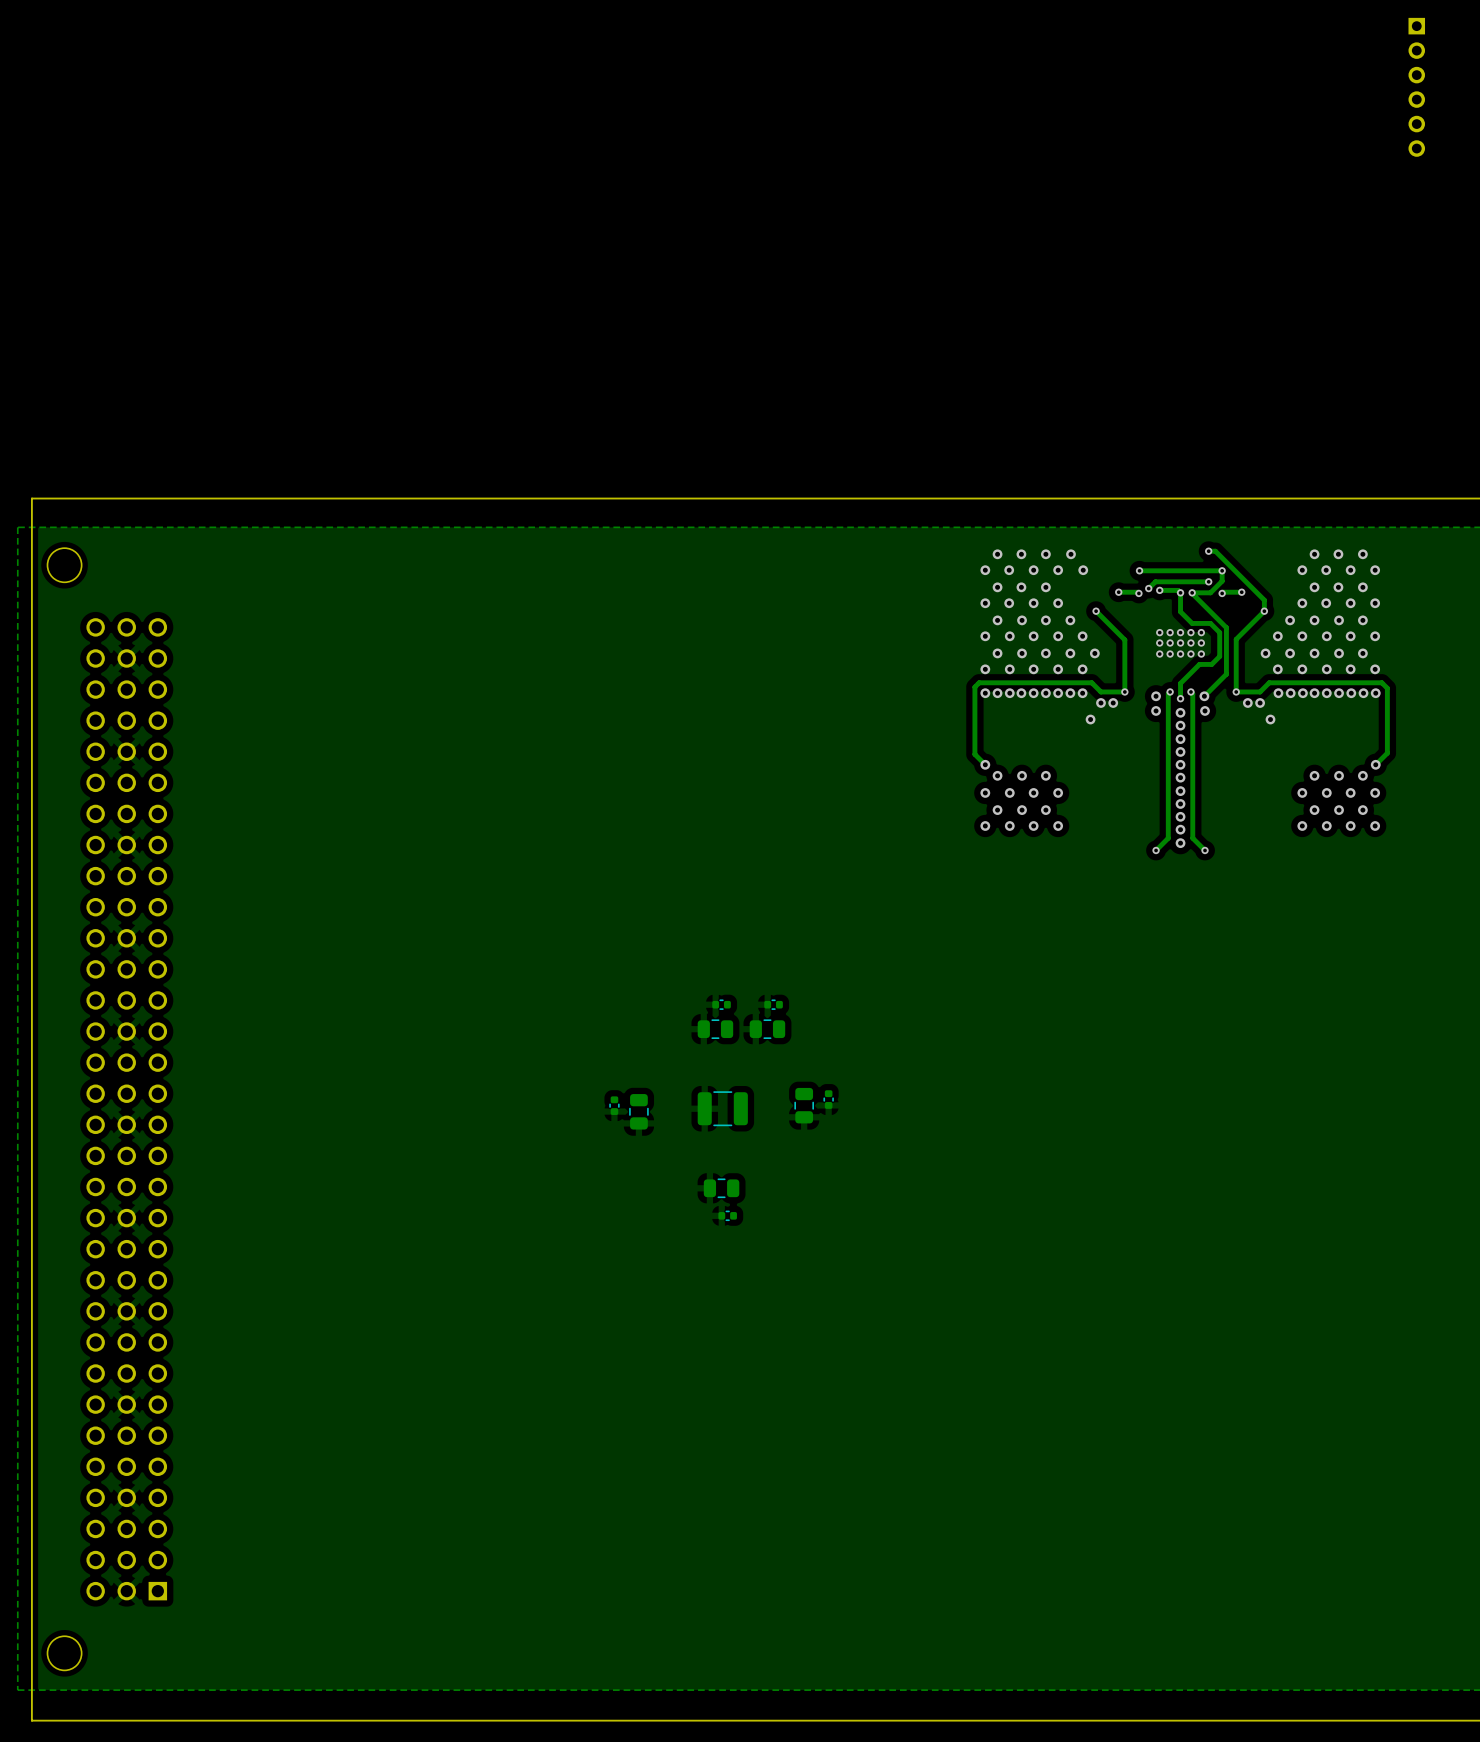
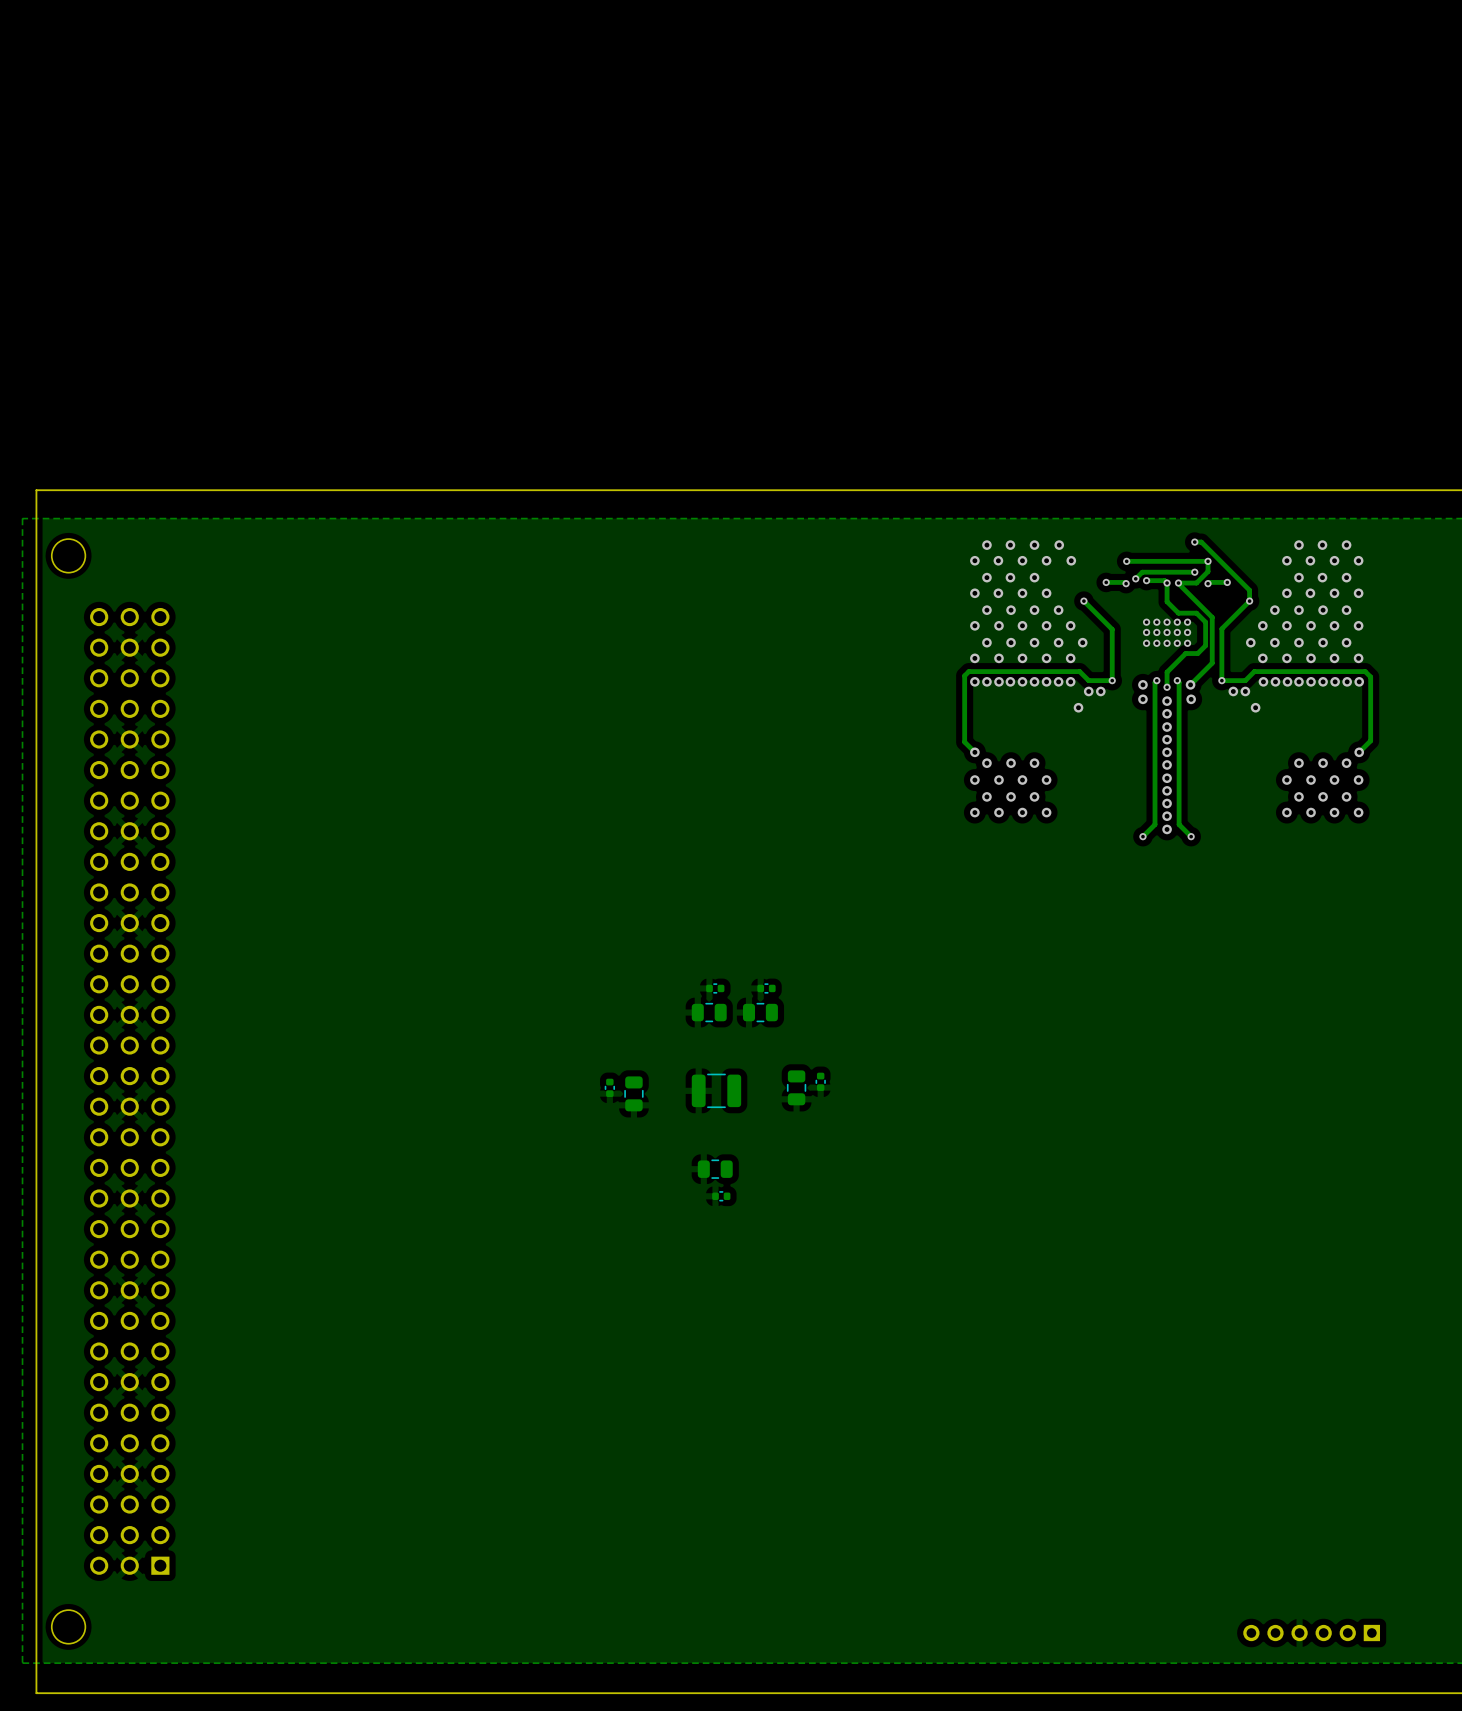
part: (1416, 87) -> none
part: none -> (1311, 1633)

